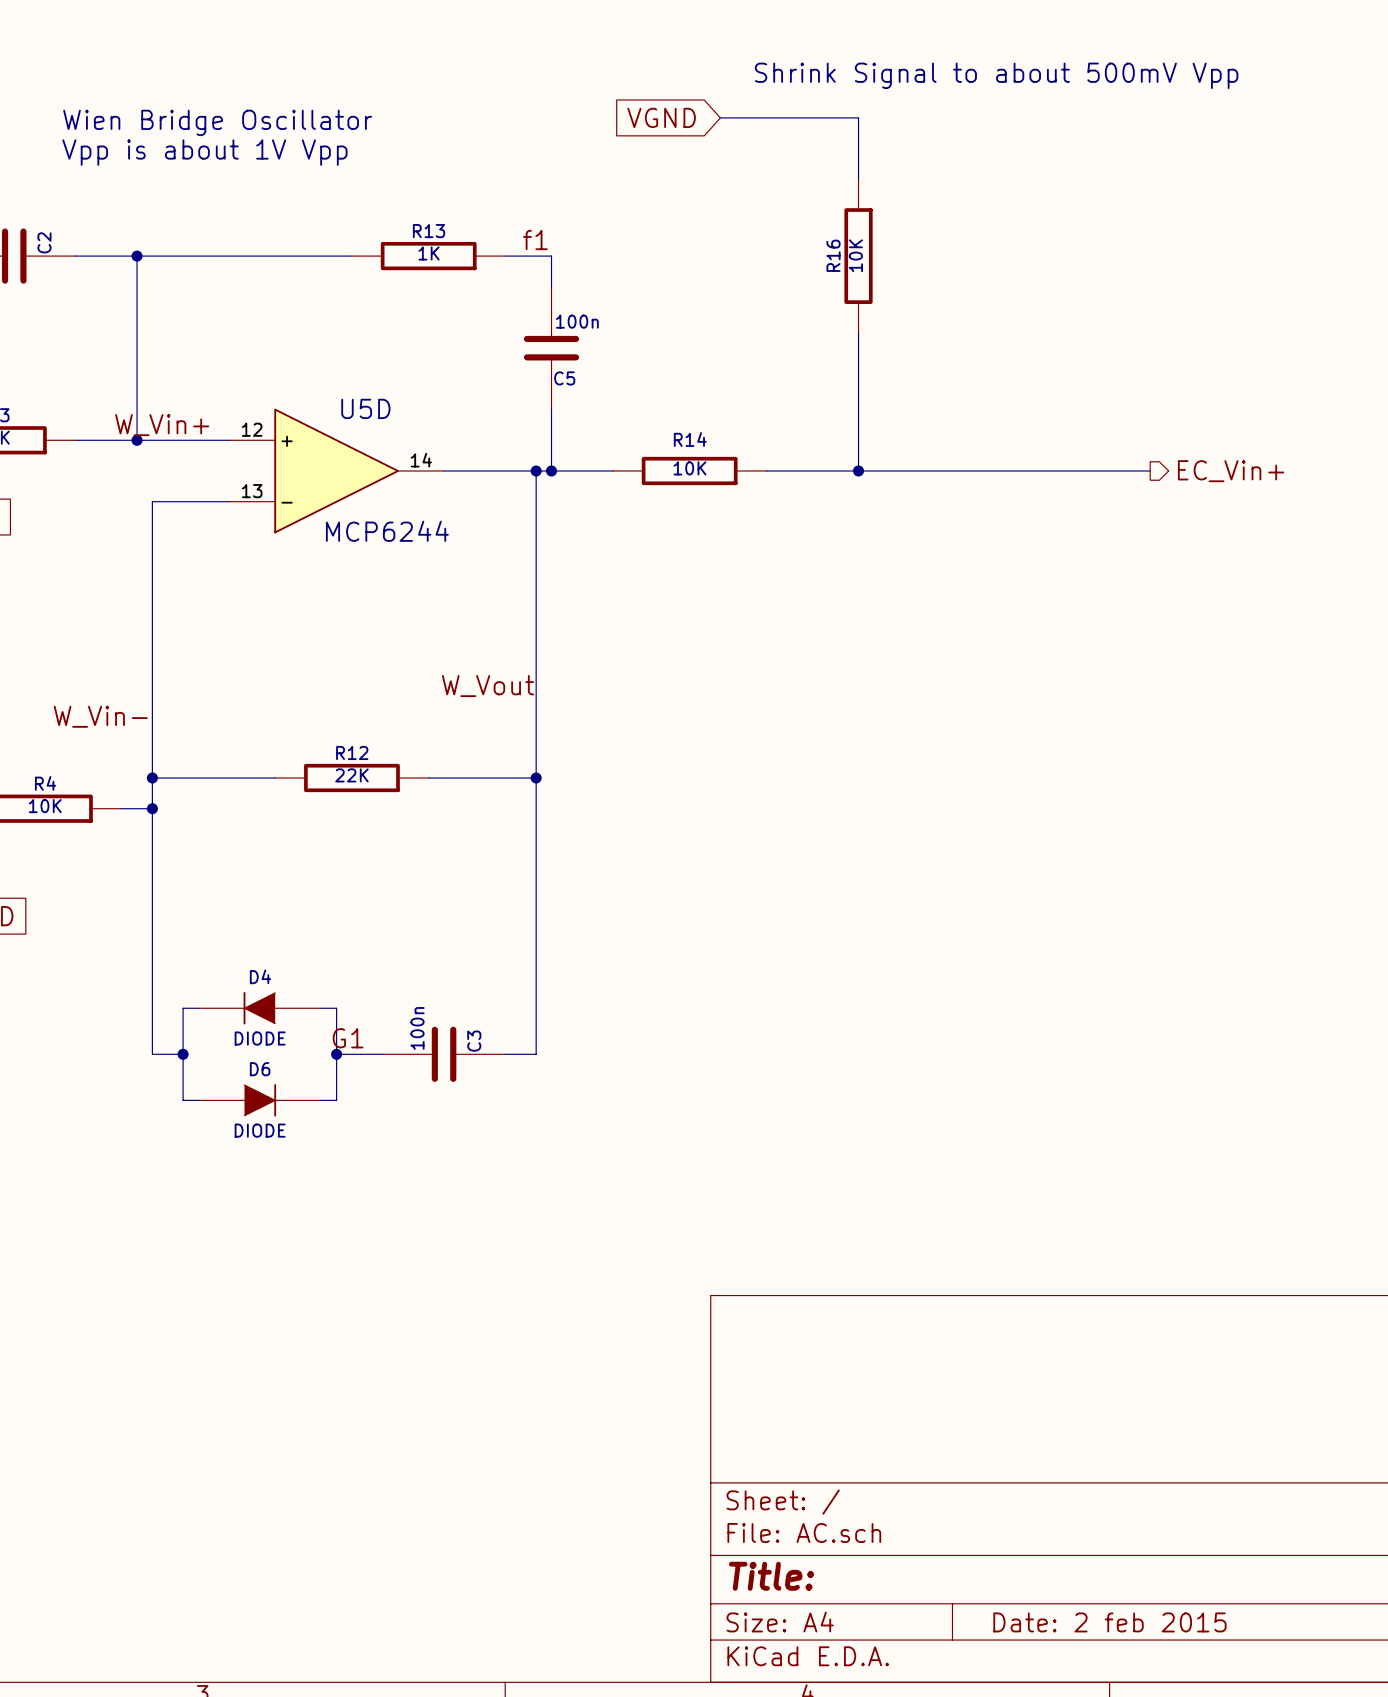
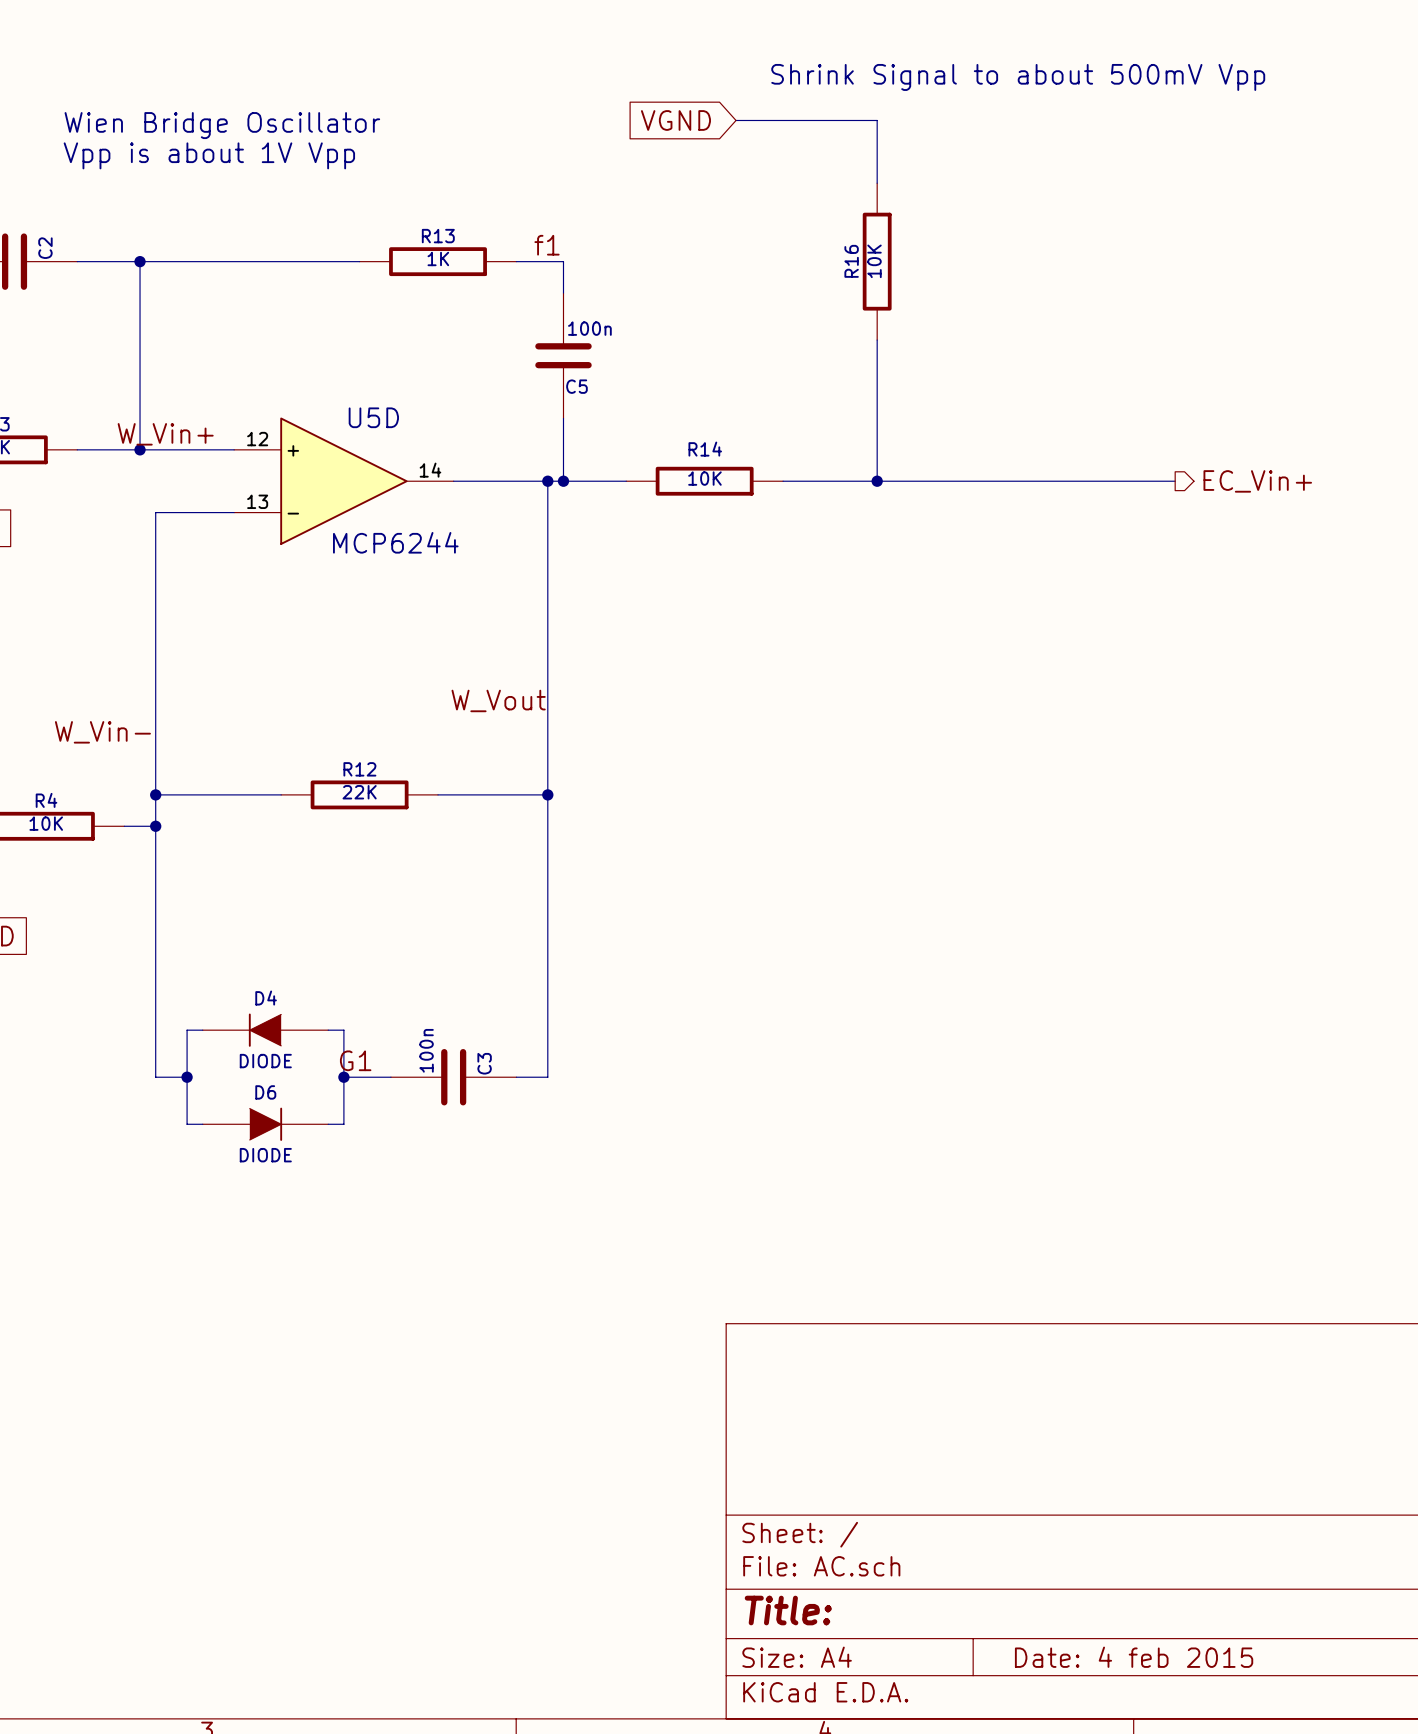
title block: Date: 2 feb 2015 (1109, 1622) -> Date: 4 feb 2015 (1134, 1657)

